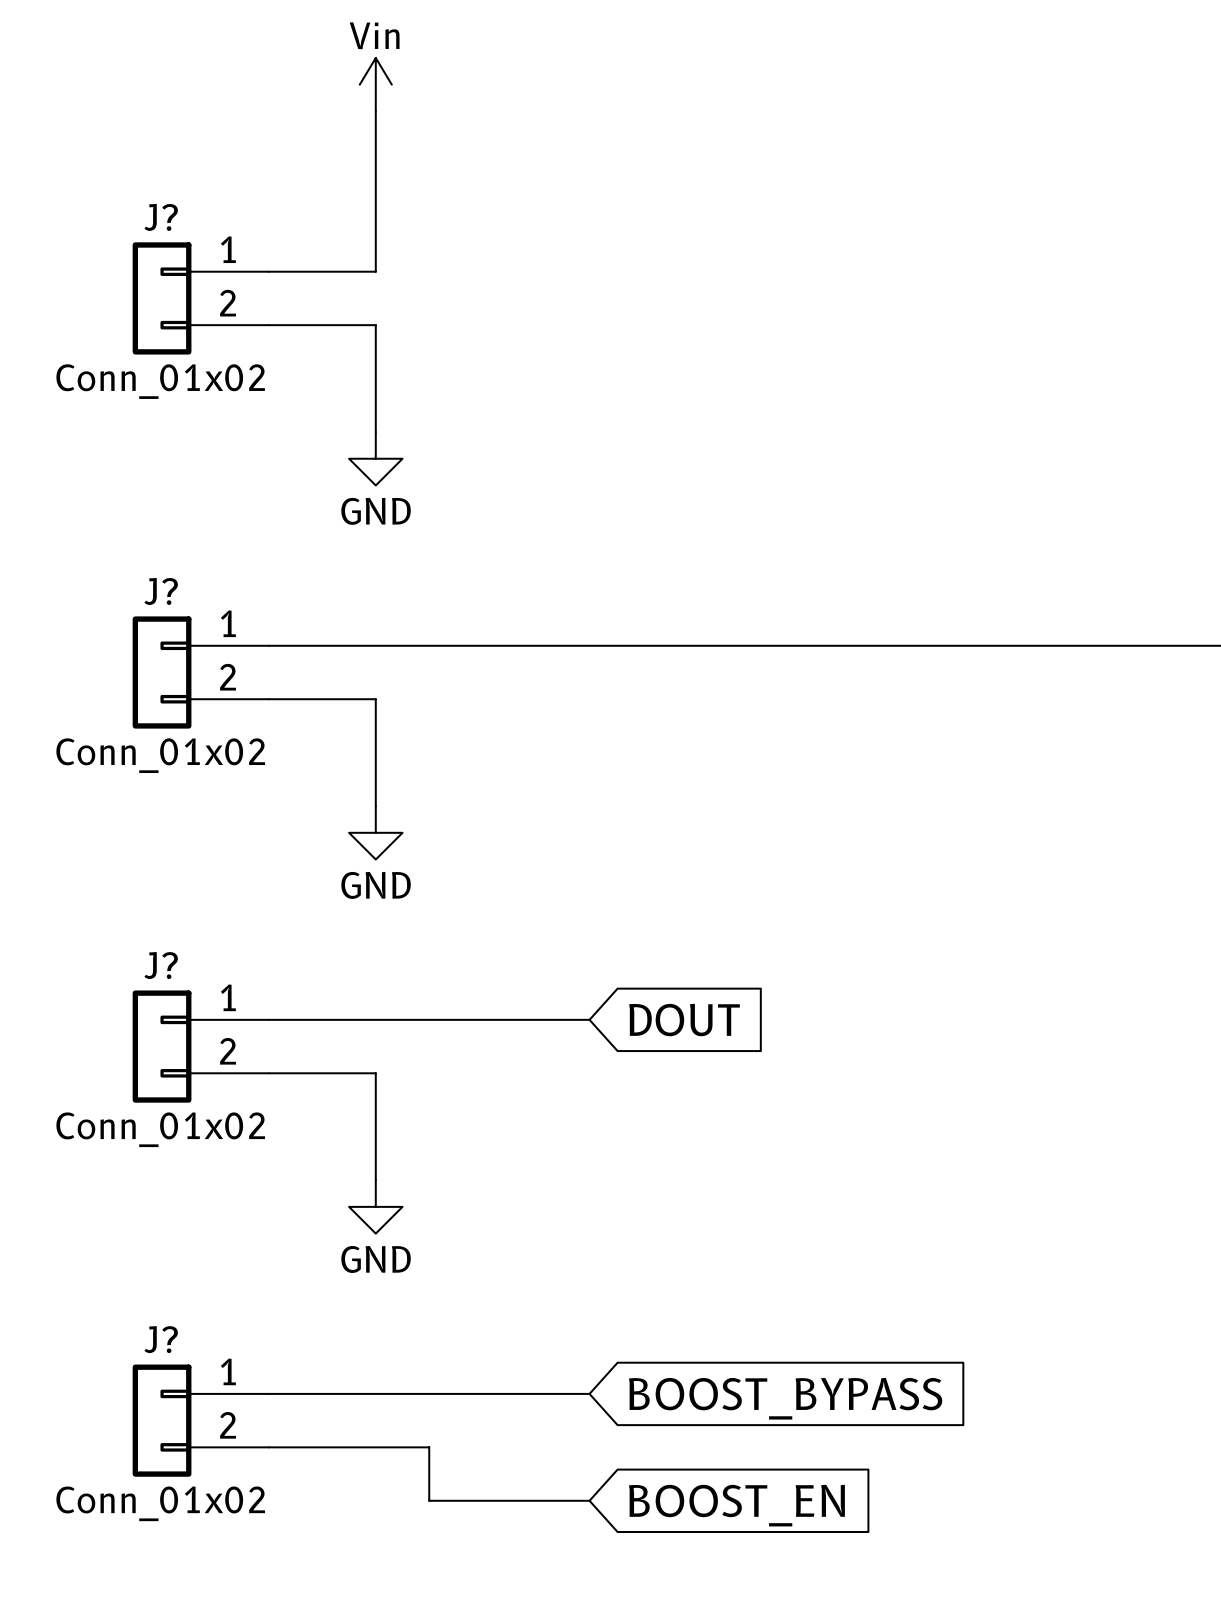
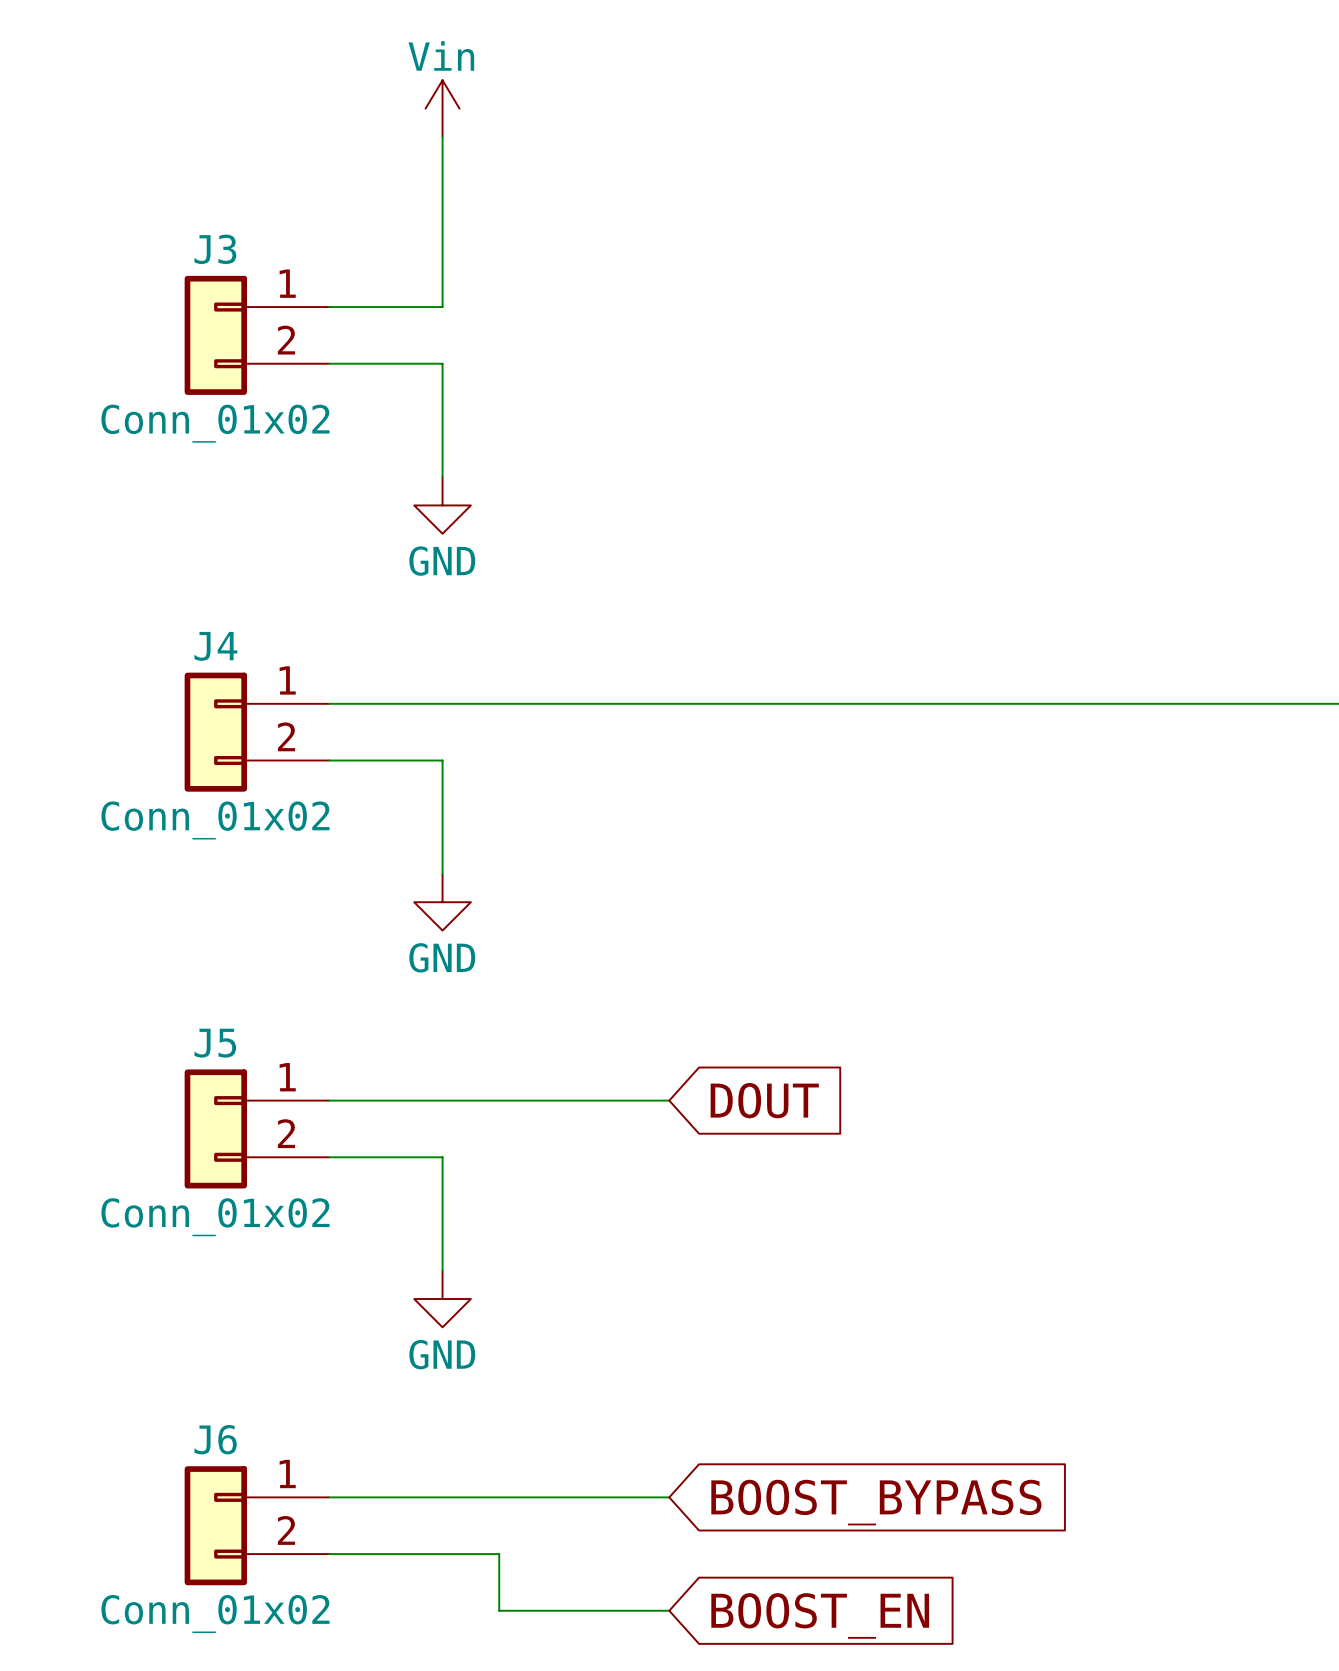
J? name: J? (161, 217) -> J3 (215, 249)
J? name: J? (161, 591) -> J4 (215, 646)
J? name: J? (161, 965) -> J5 (215, 1043)
J? name: J? (161, 1339) -> J6 (215, 1439)

